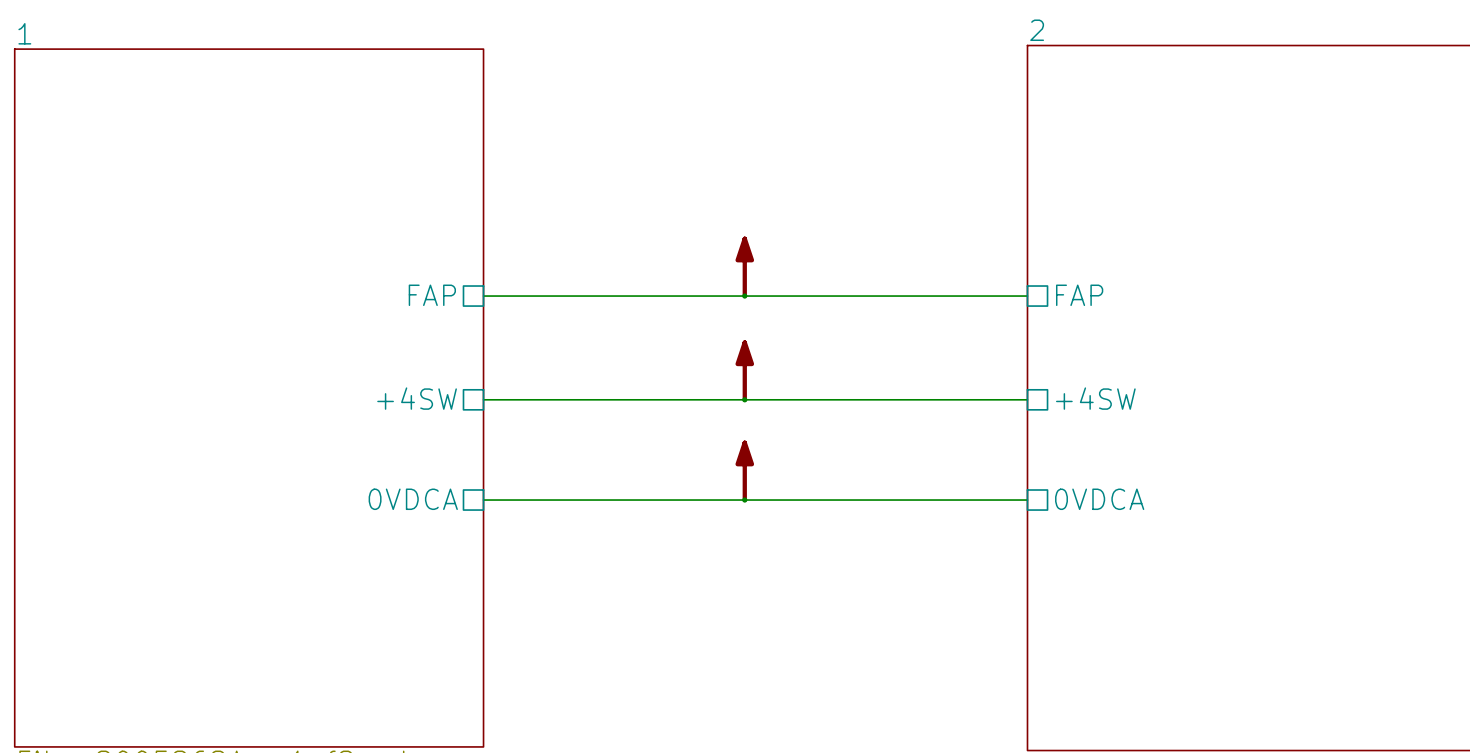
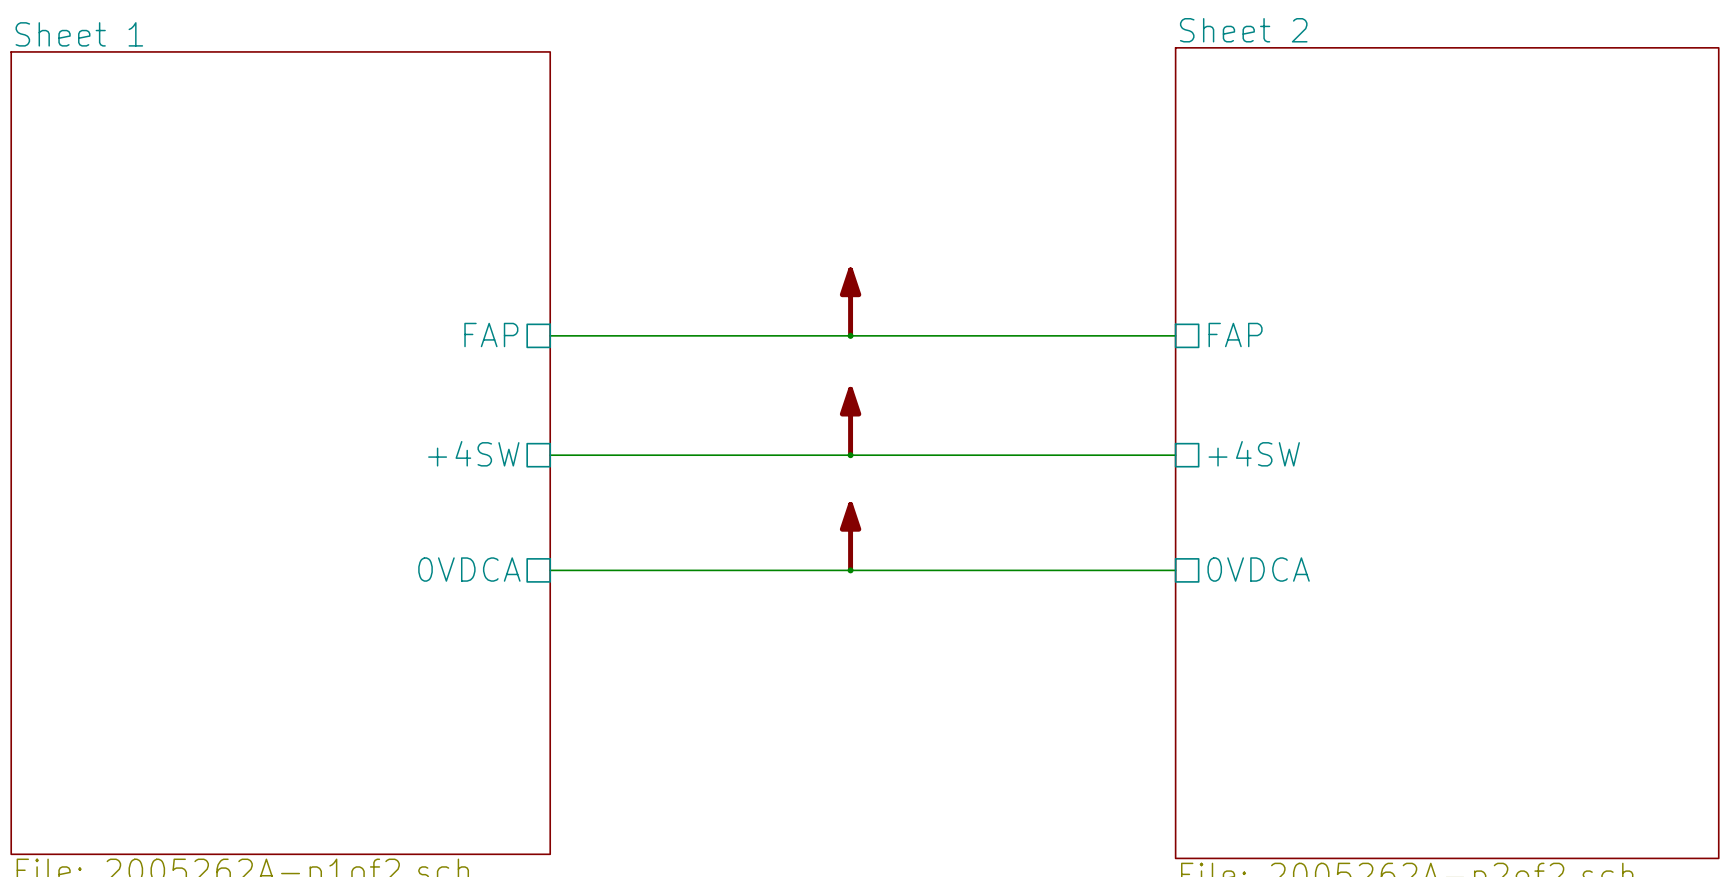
sheet 2 name: 2 (1037, 30) -> Sheet 2 (1243, 30)
sheet 1 name: 1 (24, 33) -> Sheet 1 (79, 34)

